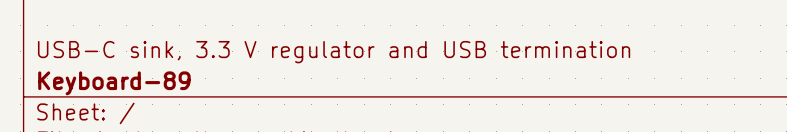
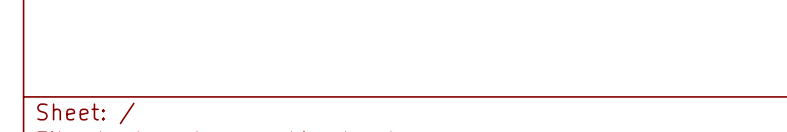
title block: USB-C sink, 3.3 V regulator and USB termination (334, 52) -> none
title block: Keyboard-89 (114, 83) -> none

